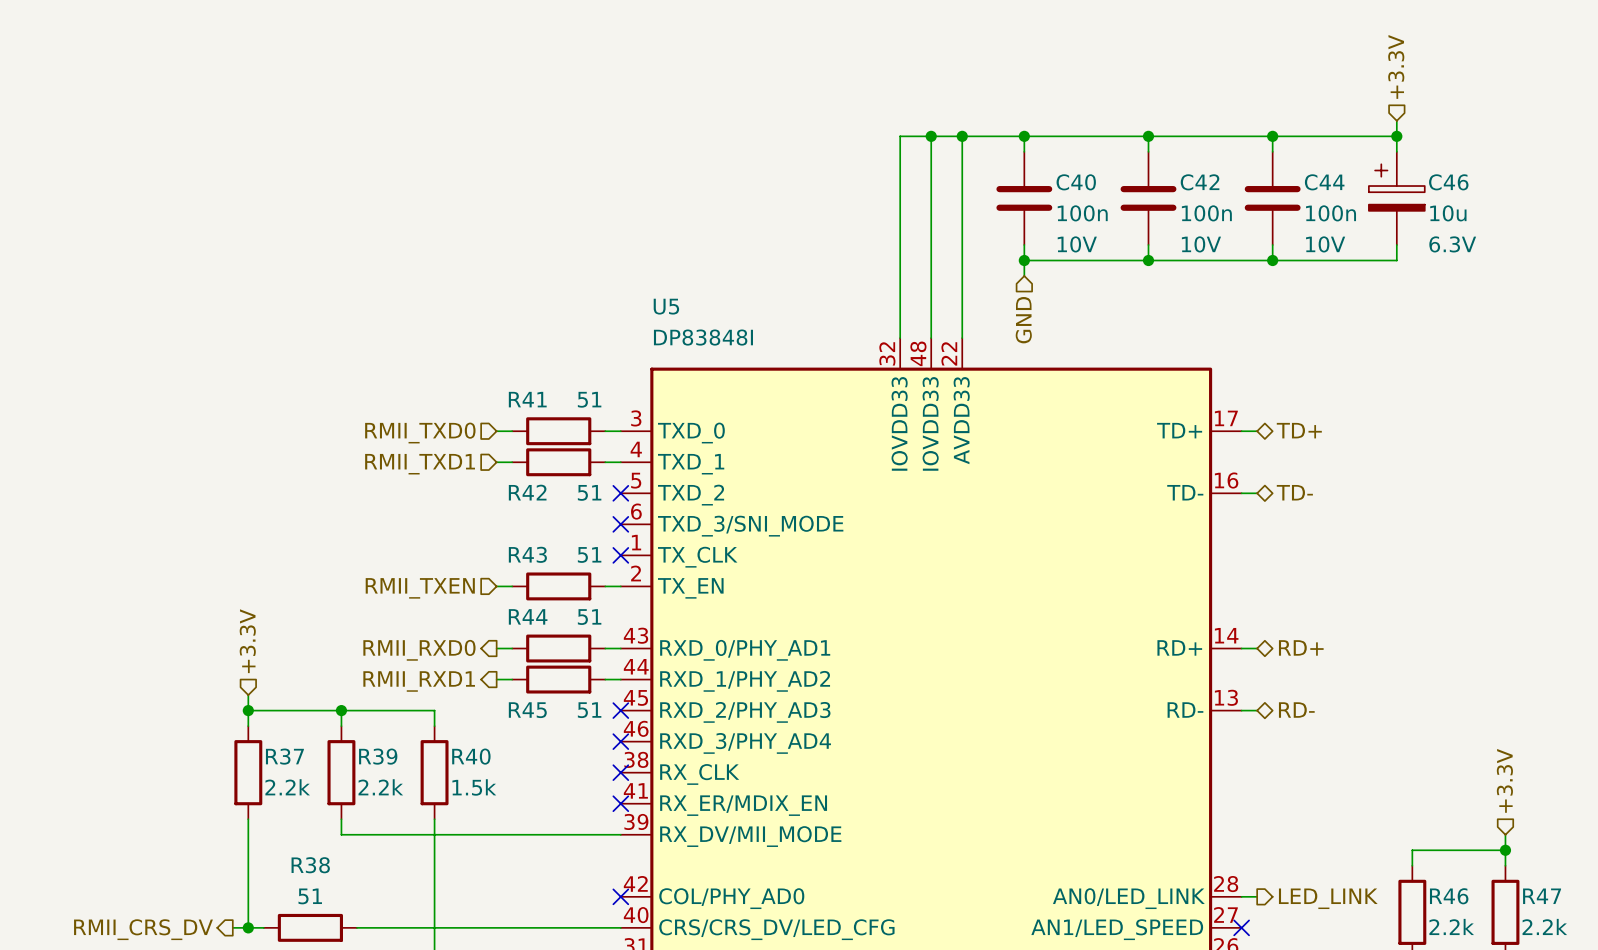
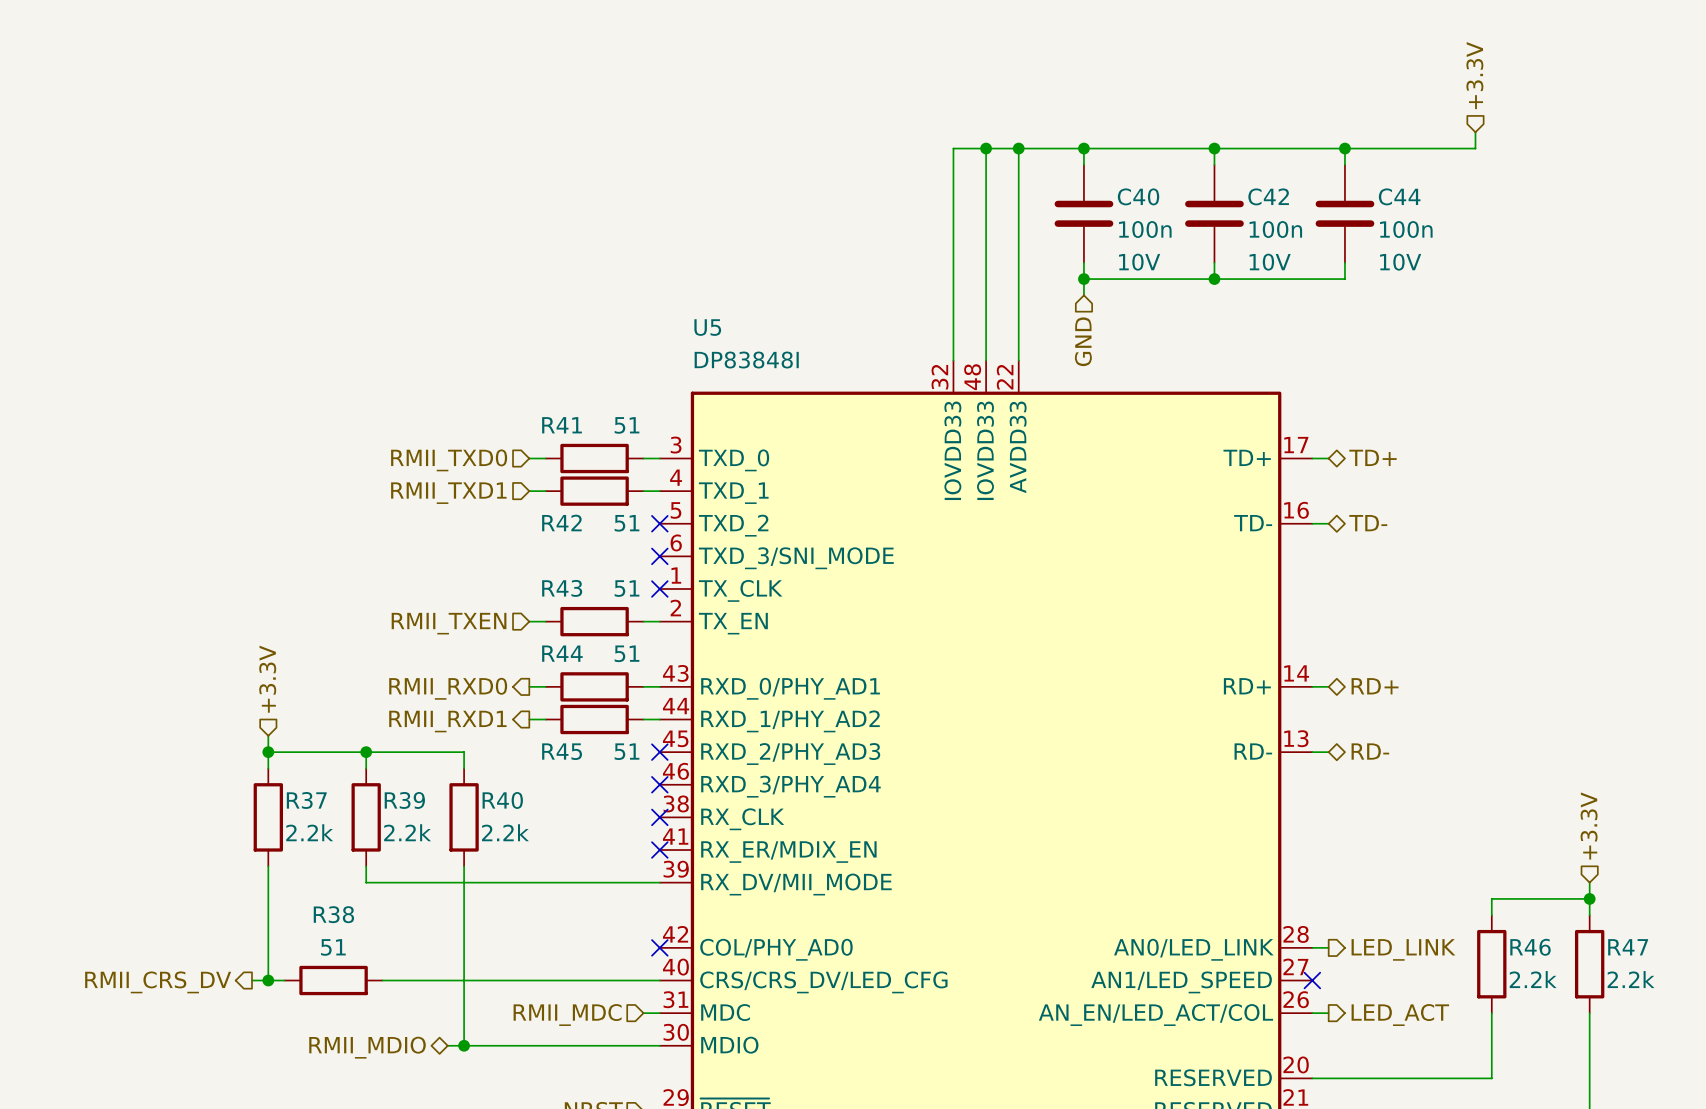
wire: (1396, 136) (1396, 151) -> none
junction: (1396, 136) -> none
C46: 10u (1396, 198) -> none
wire: (1396, 244) (1396, 260) (1272, 260) -> none
junction: (1272, 260) -> none
R40 value: 1.5k (474, 787) -> 2.2k (505, 832)

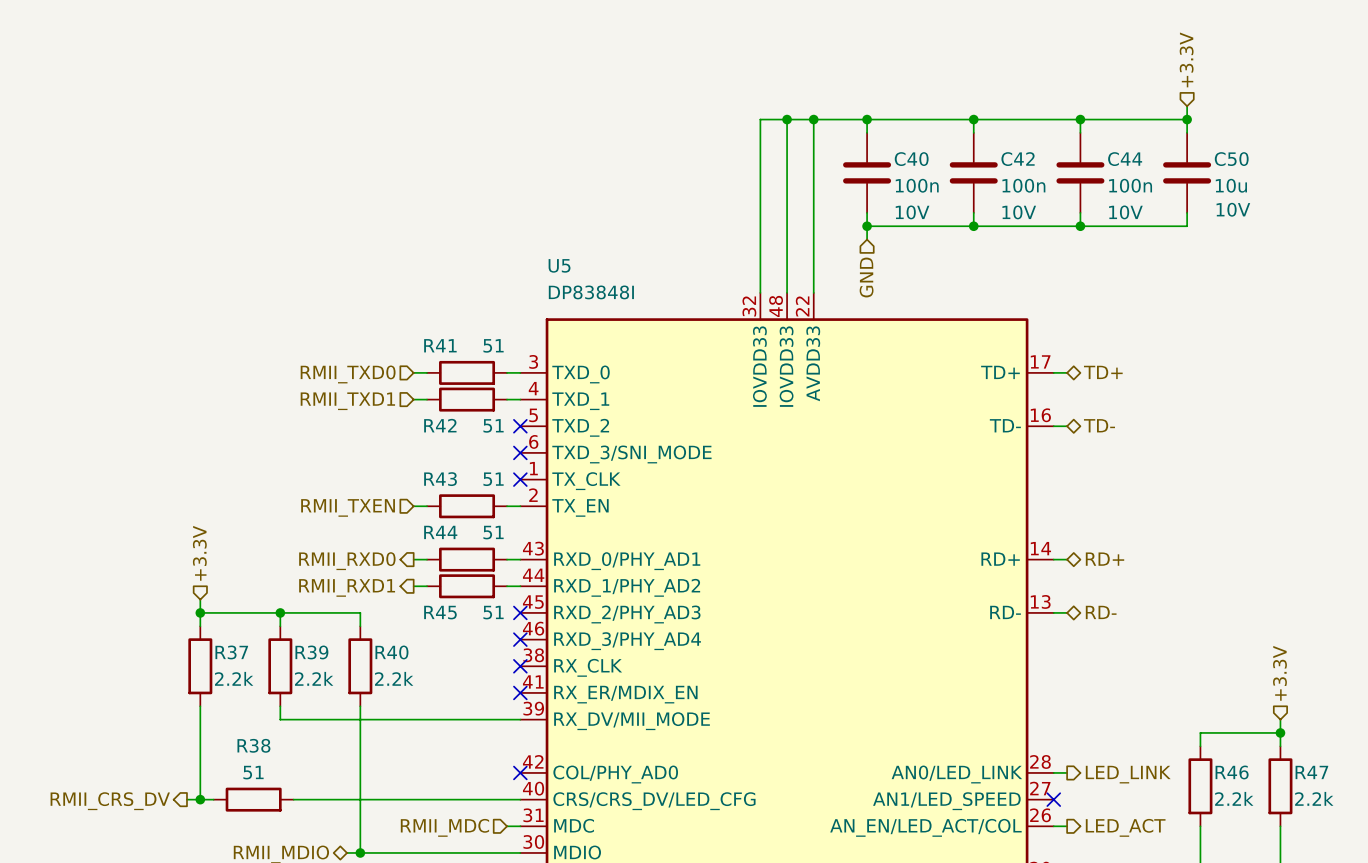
wire: none -> (1187, 119) (1187, 132)
junction: none -> (1187, 119)
C50: none -> 10u (1187, 172)
wire: none -> (1187, 212) (1187, 226) (1080, 226)
junction: none -> (1080, 226)

